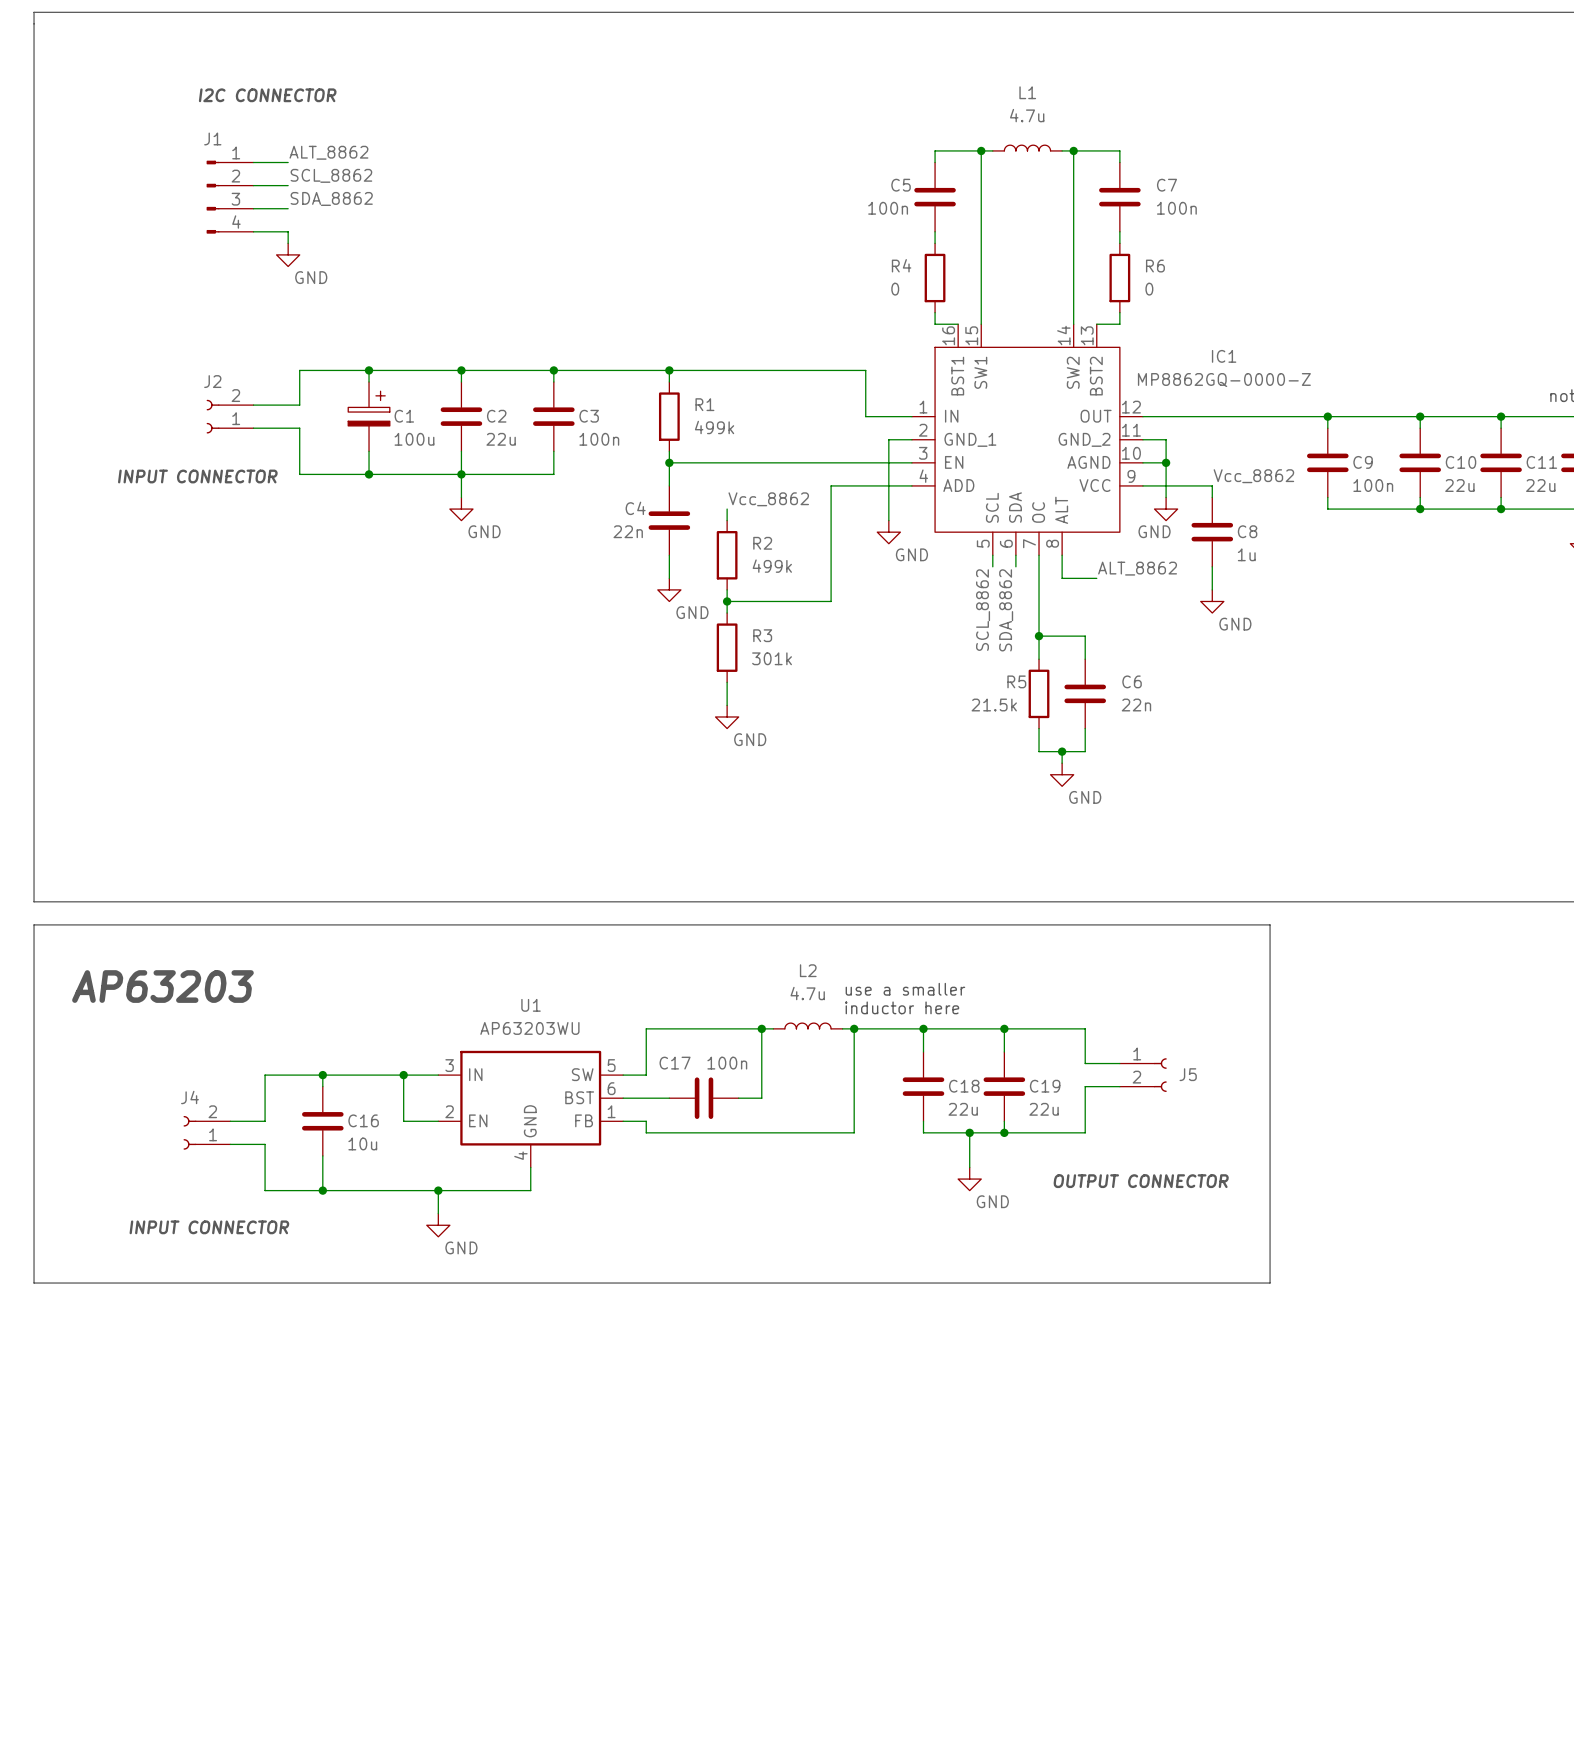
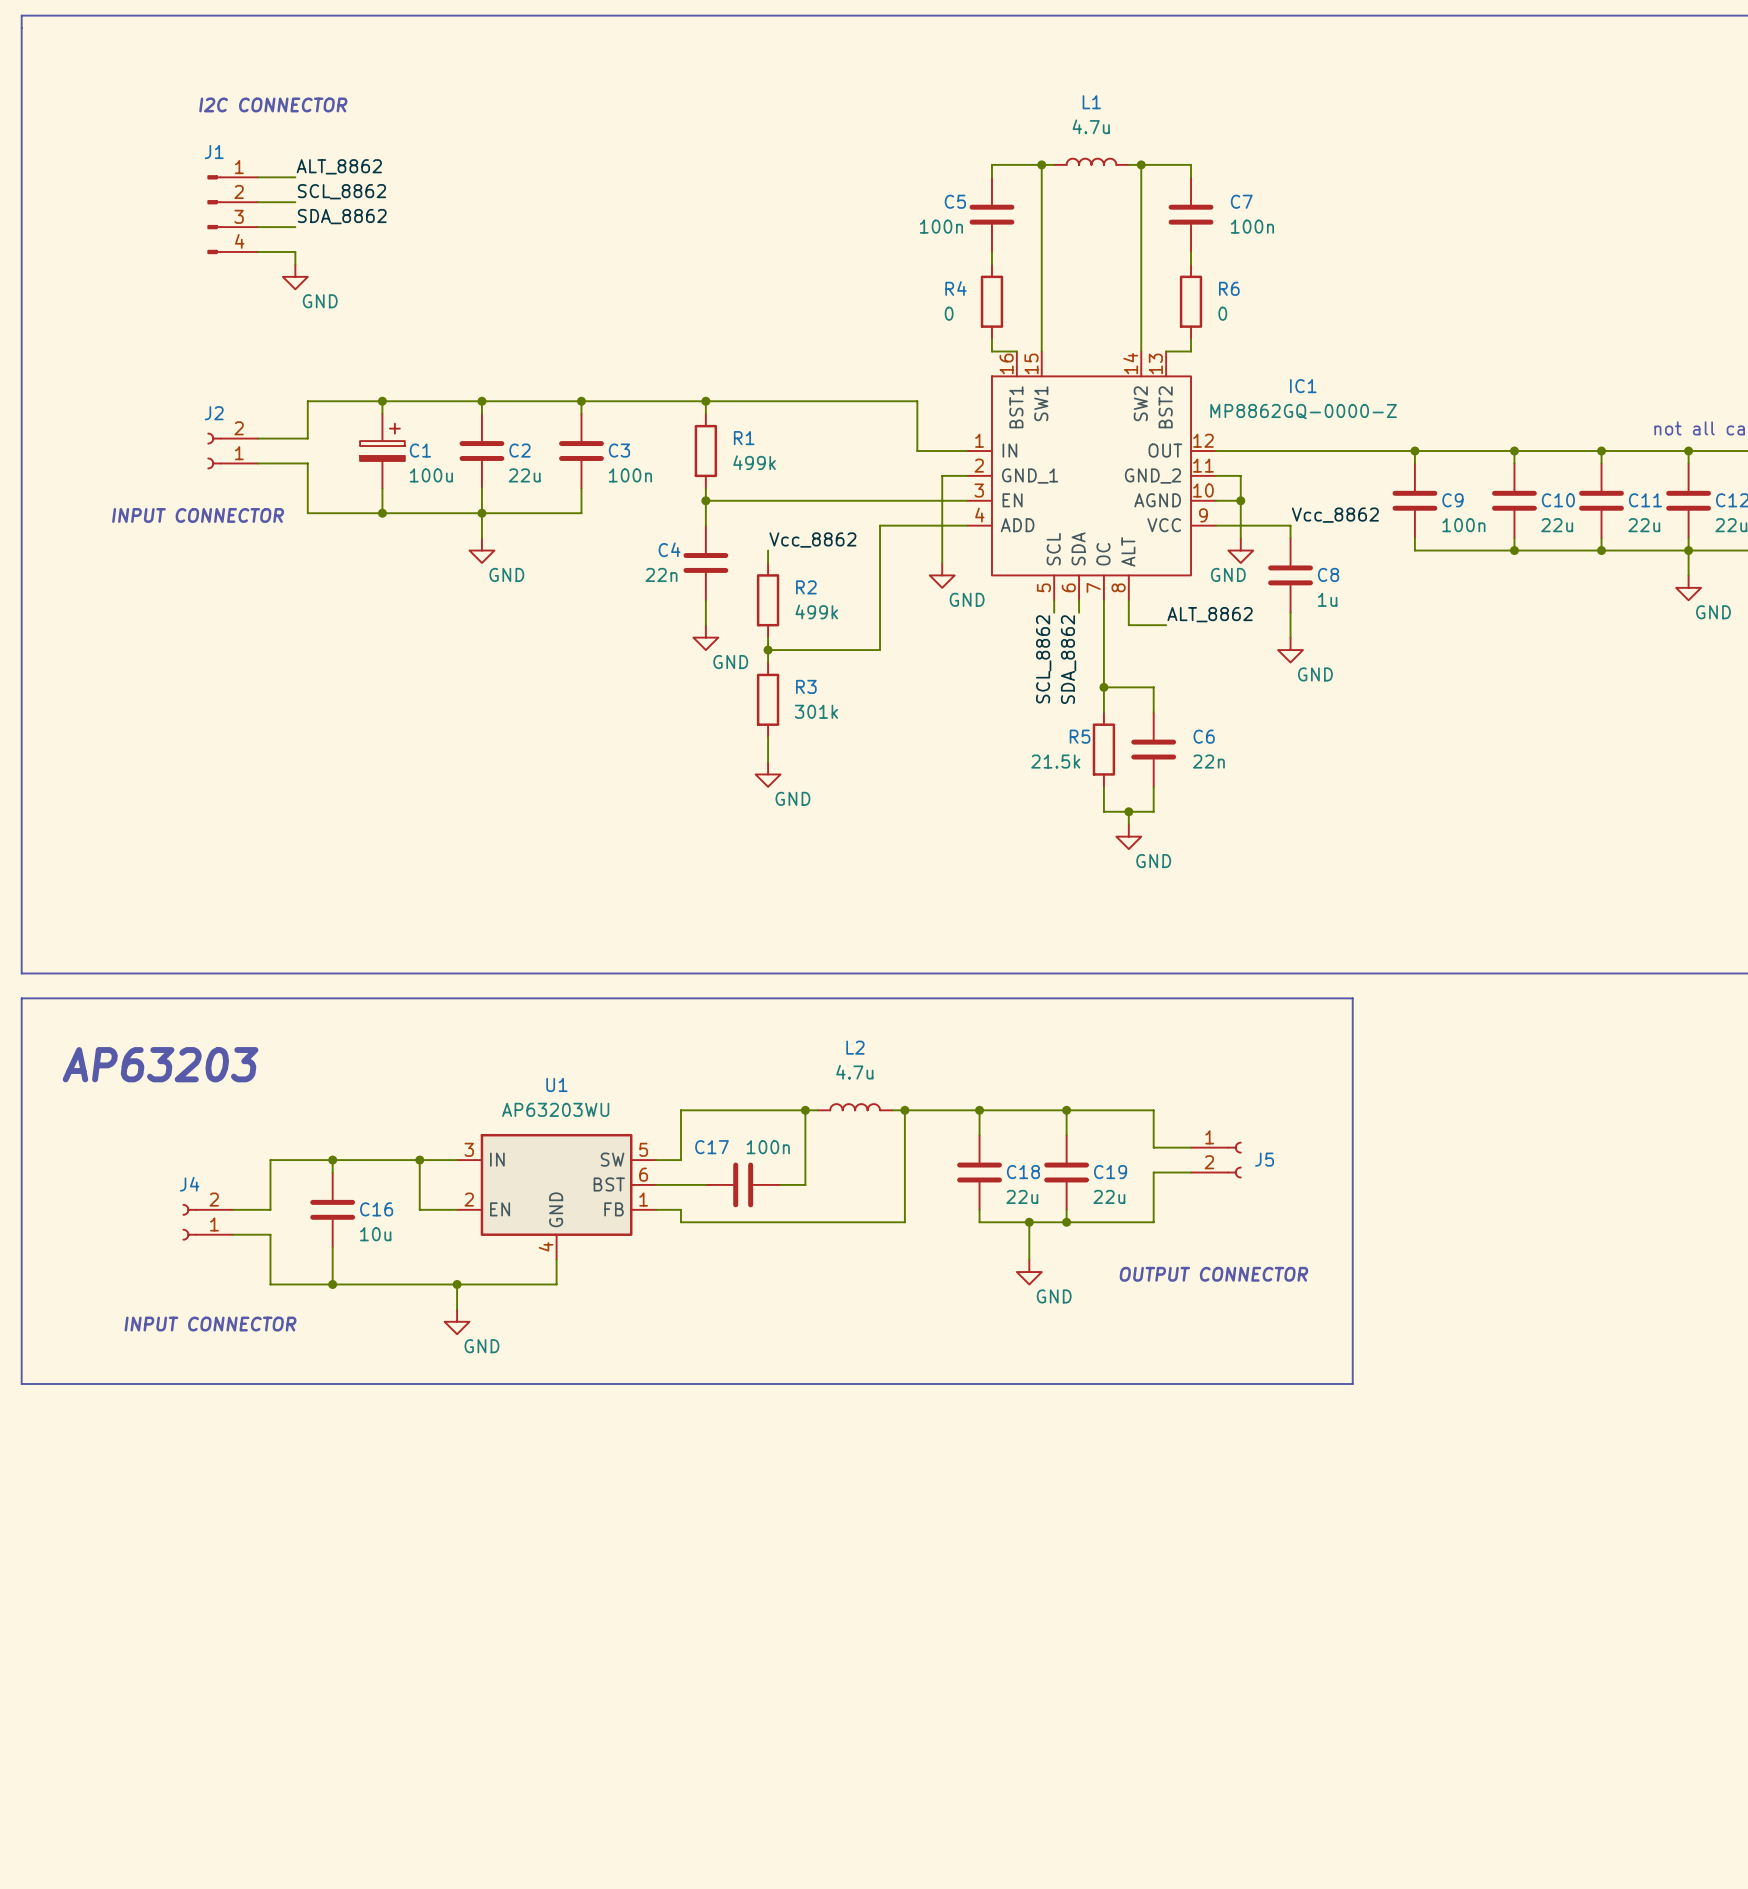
text: use a smaller (905, 989) -> none
text: inductor here (902, 1007) -> none

